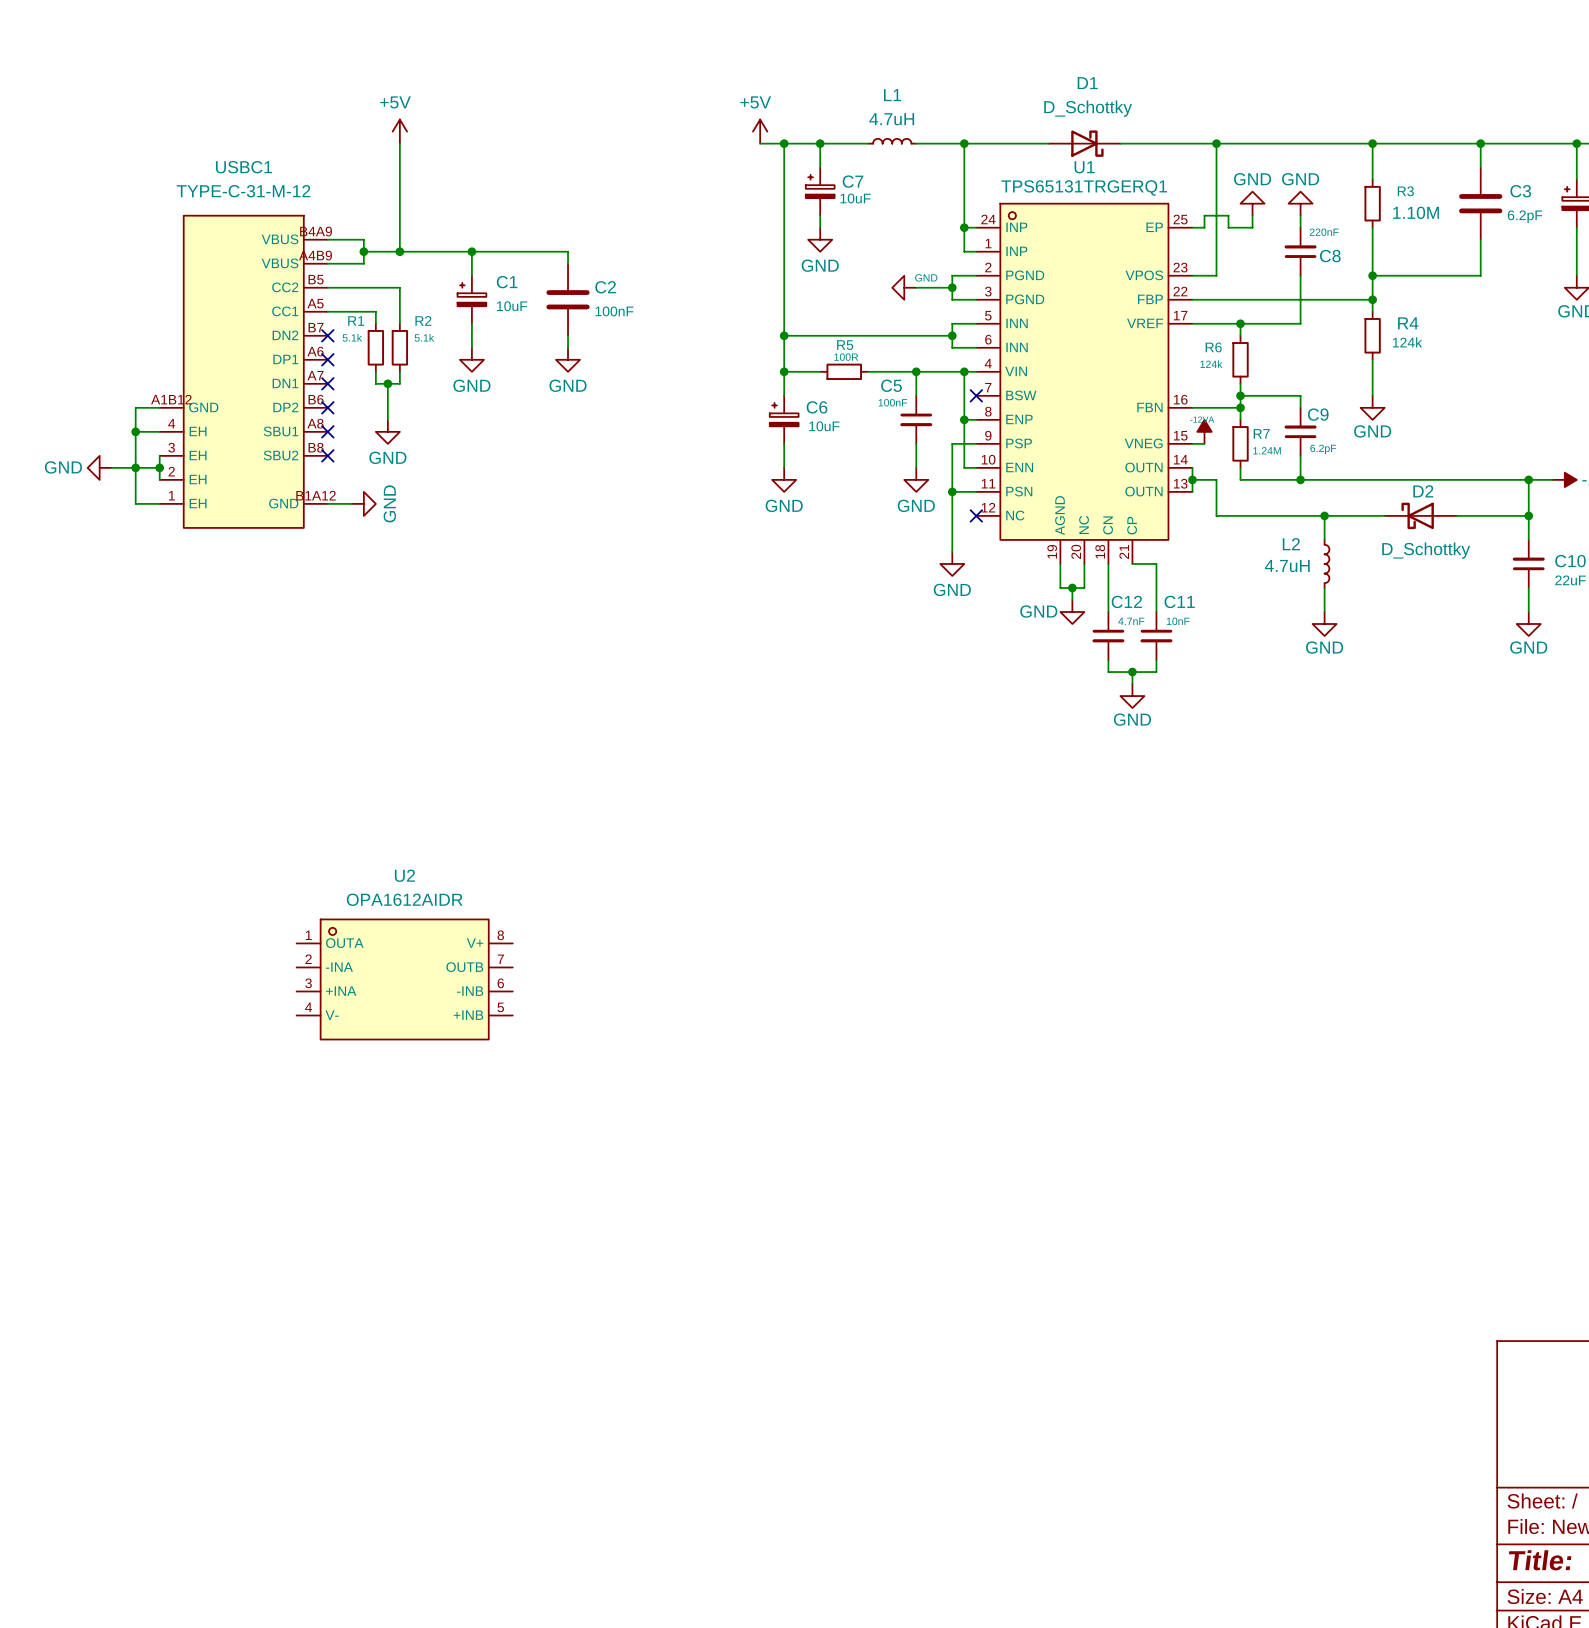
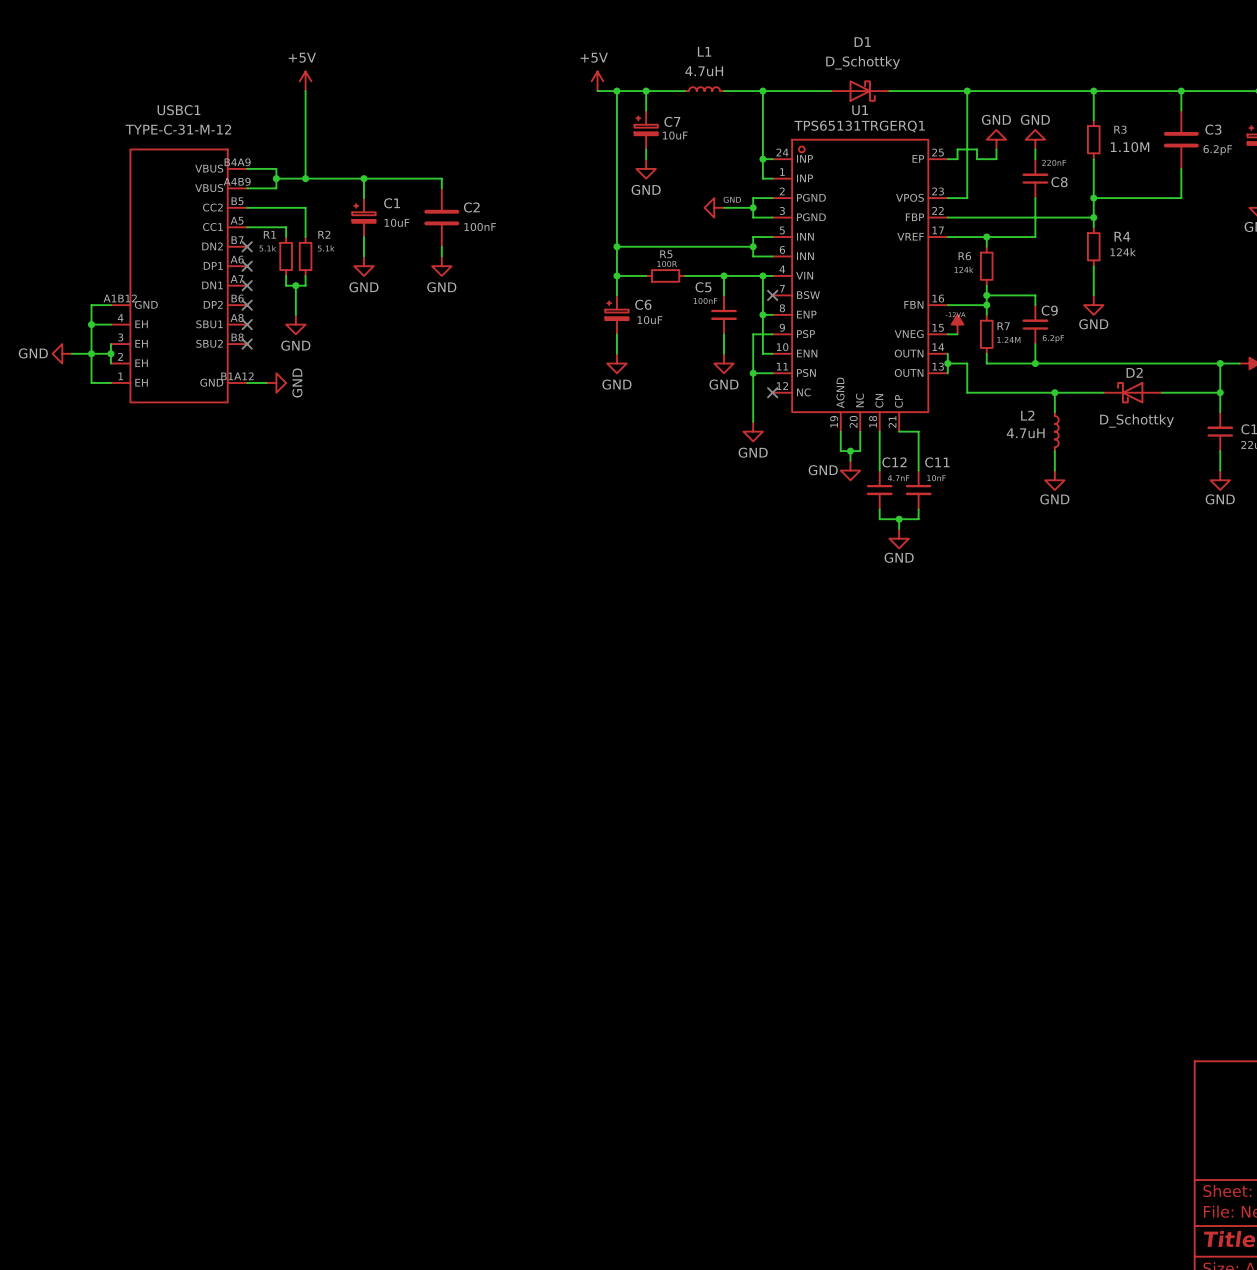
U2: OPA1612AIDR (404, 979) -> none

